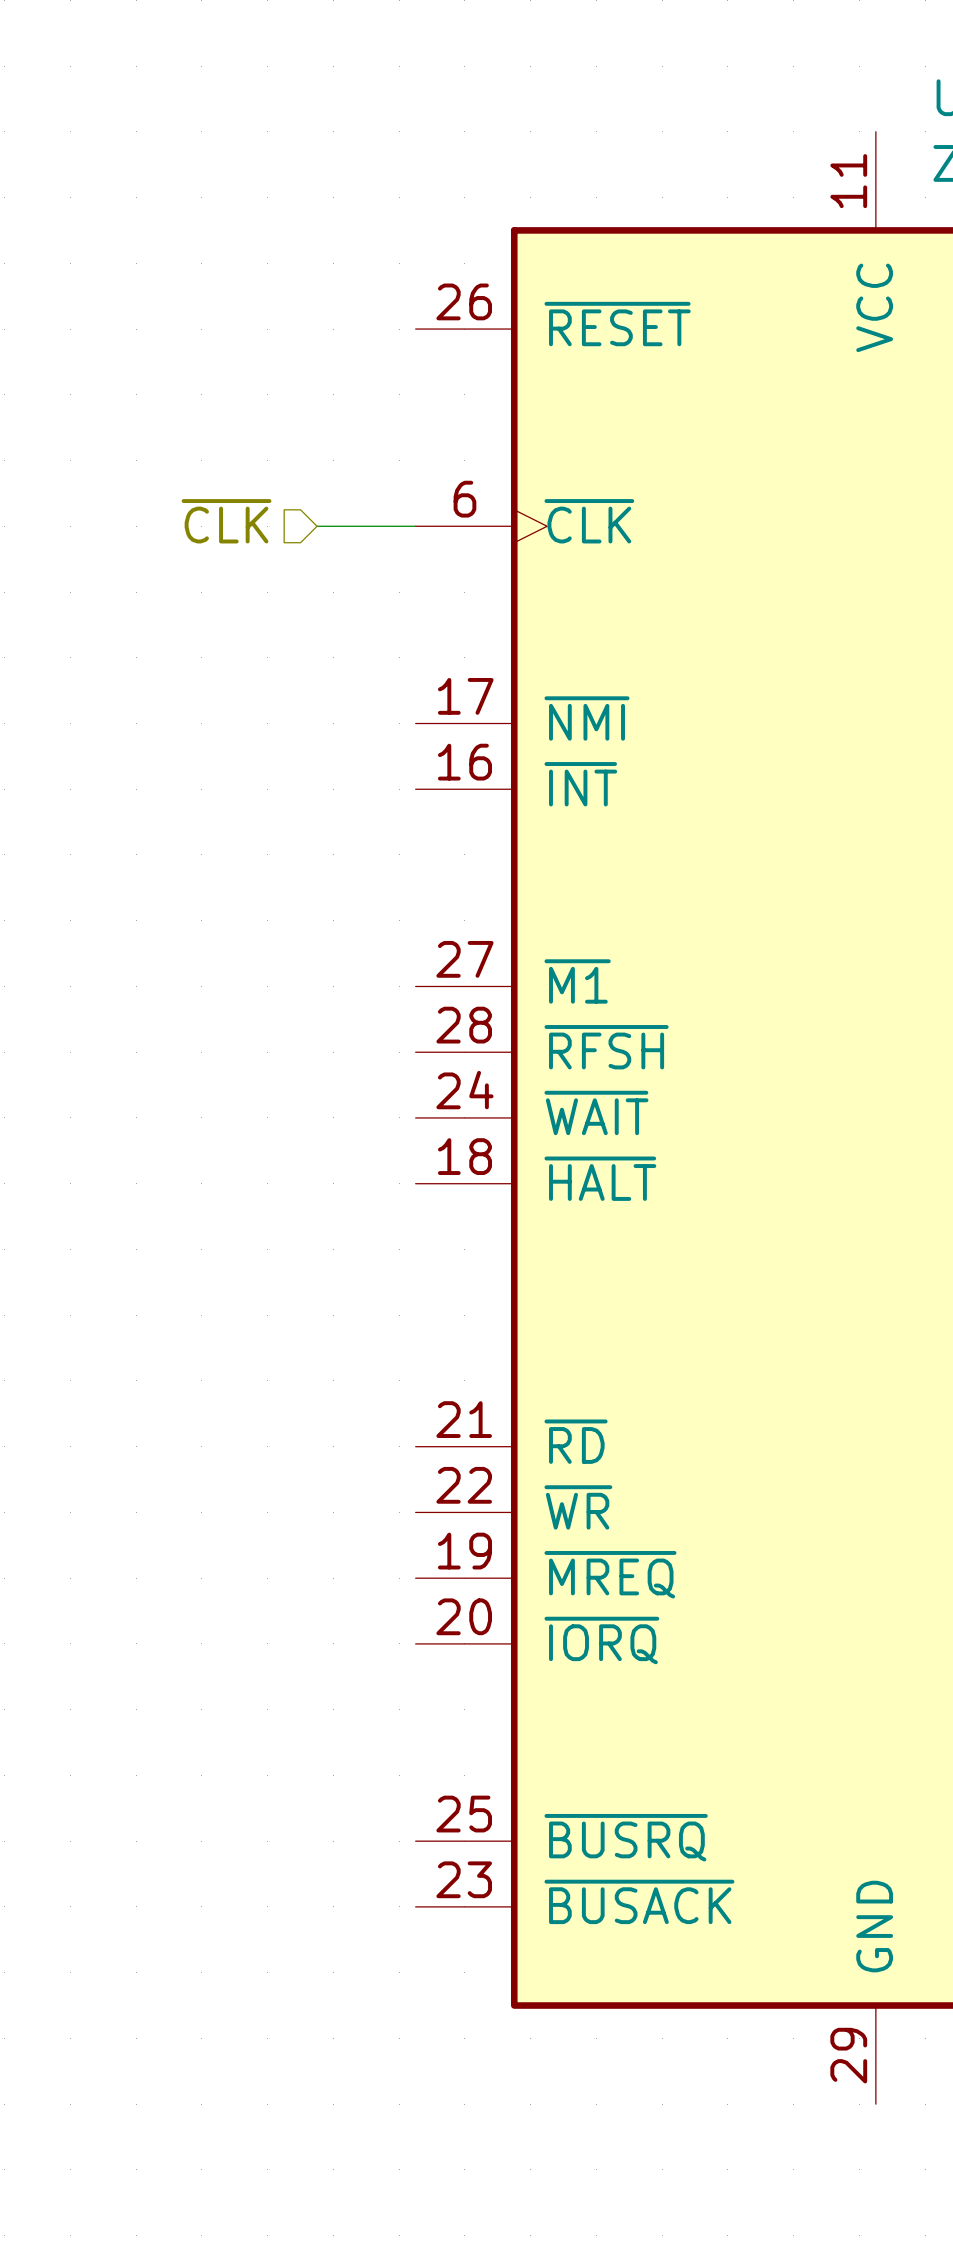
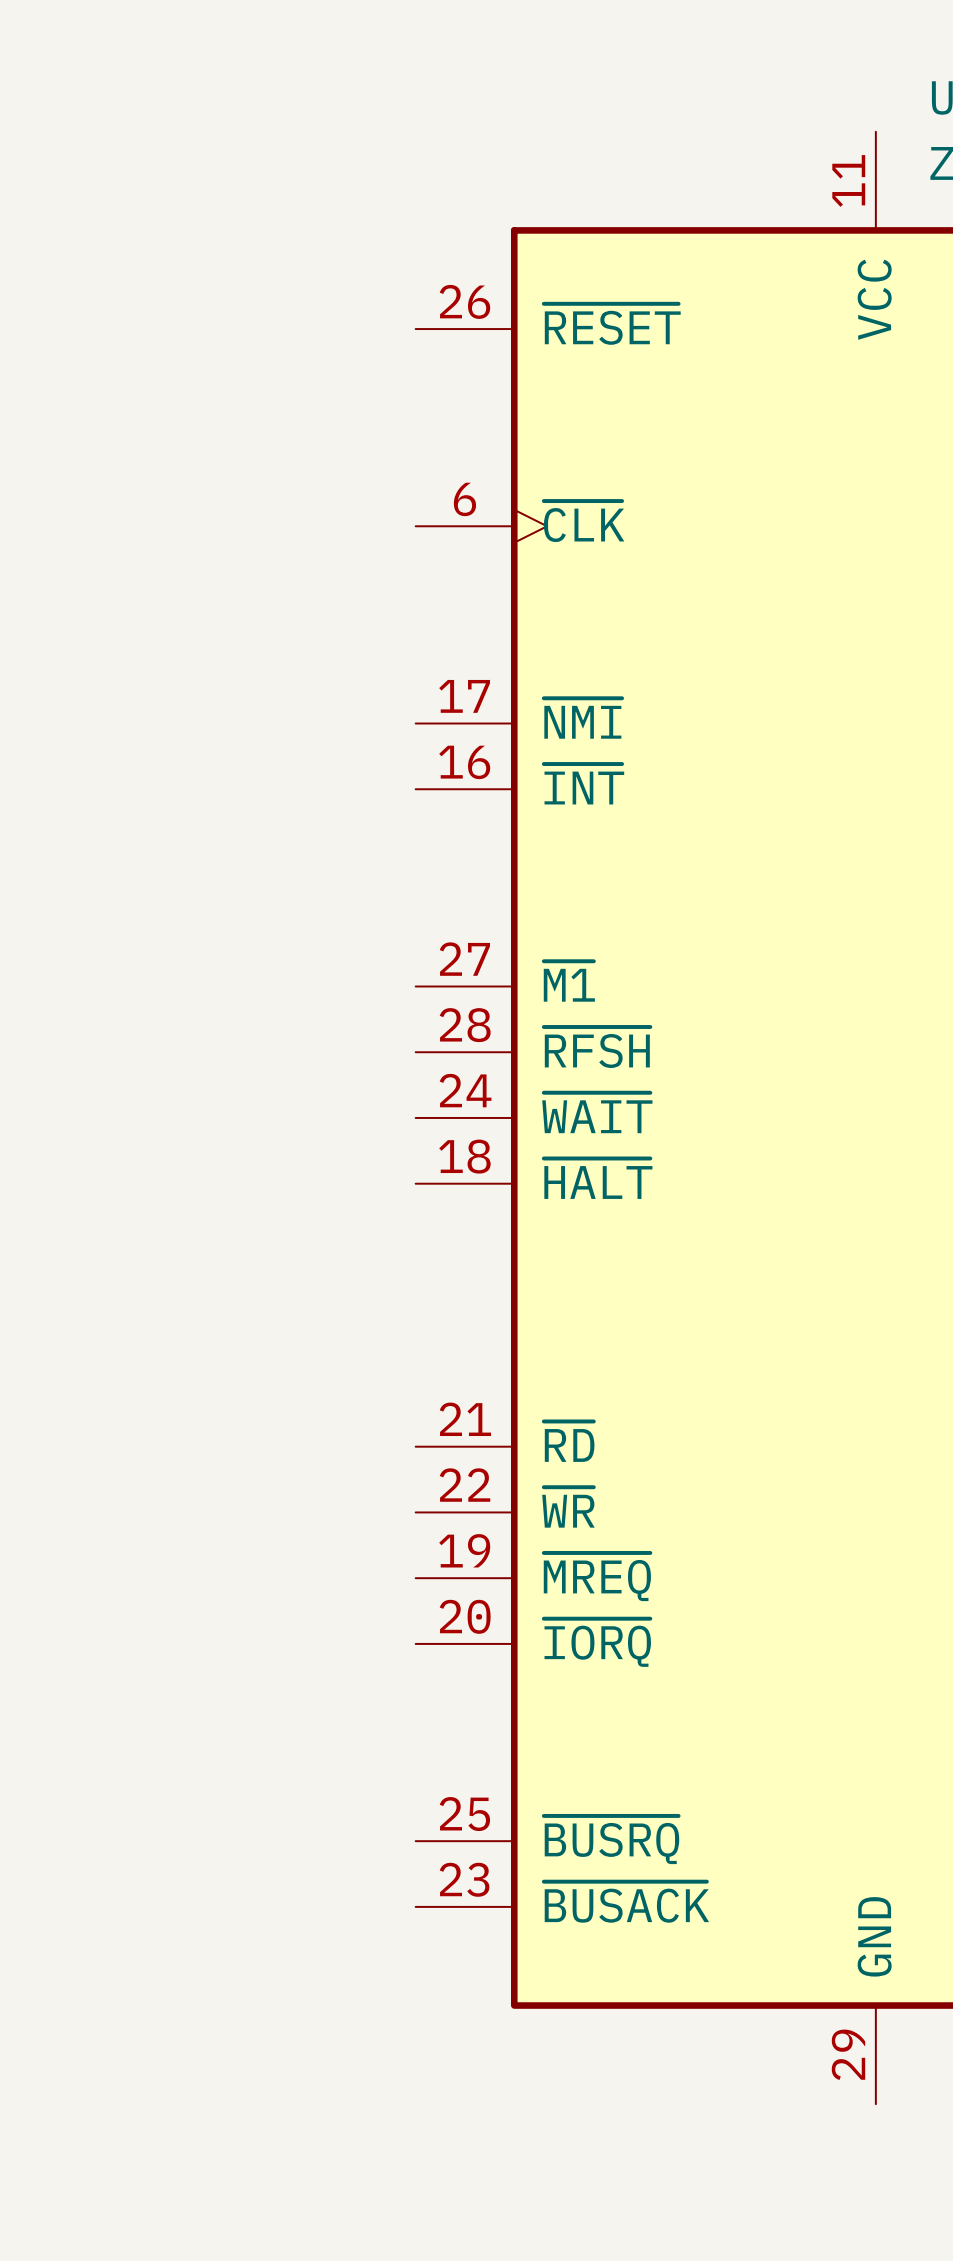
hierarchical label: ~{CLK} (226, 521) -> none
wire: (317, 526) (415, 526) -> none

